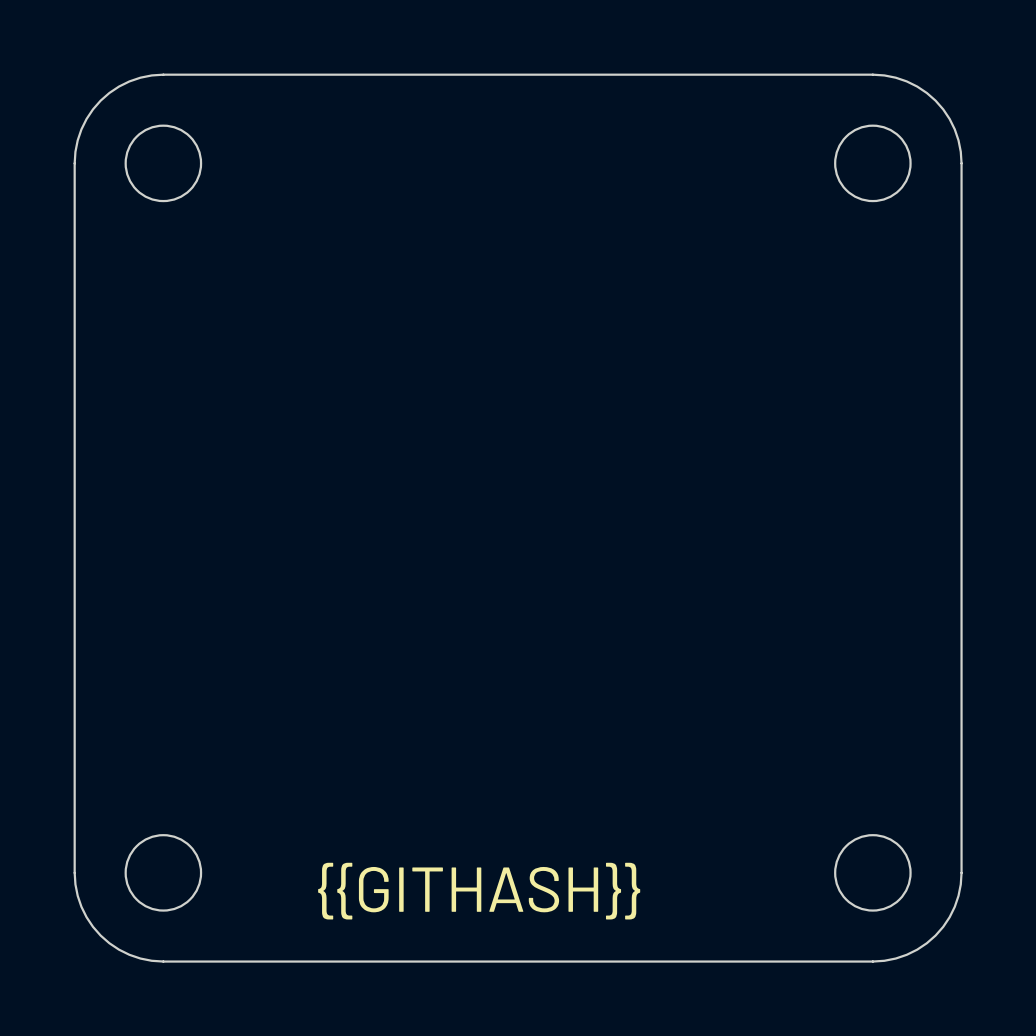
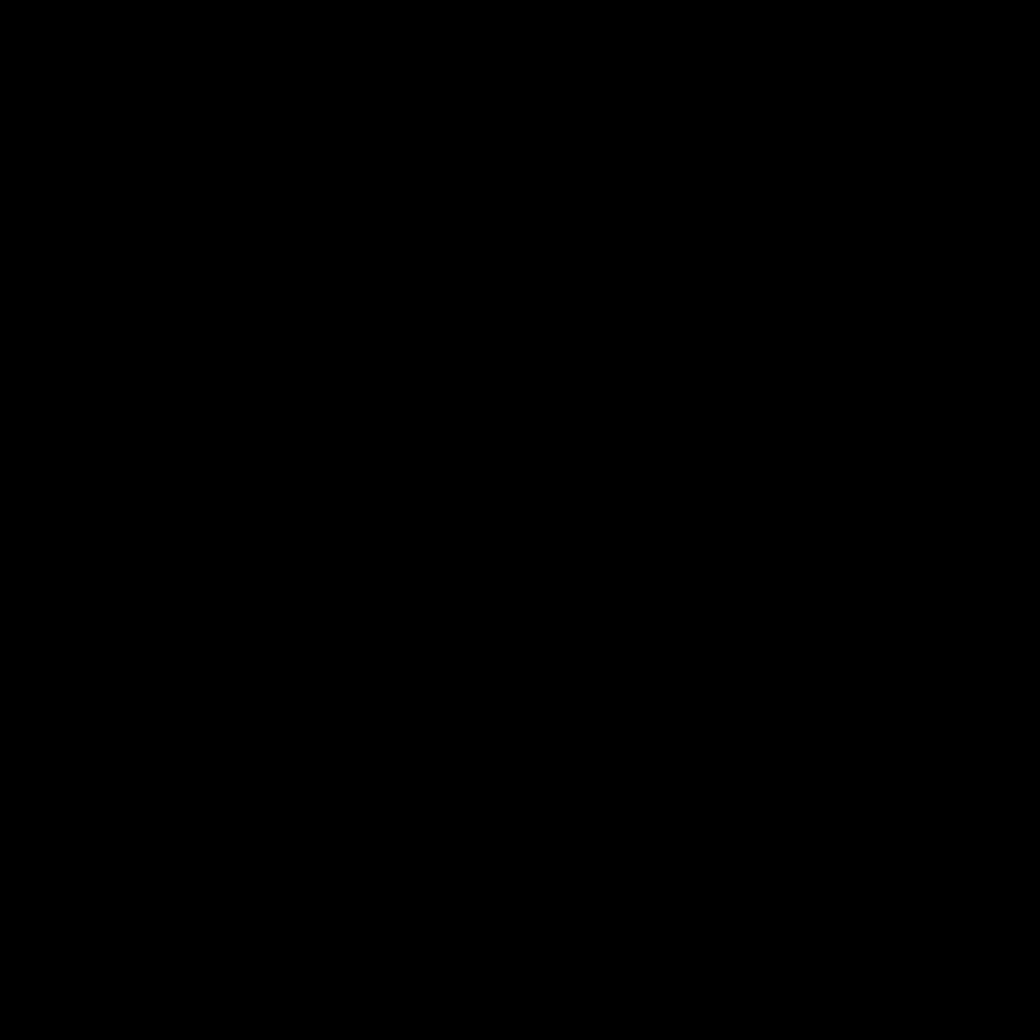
board edge: (163, 74) (872, 74) (895, 77) (906, 81) (926, 93) (935, 100) (943, 109) (954, 129) (958, 140) (961, 163) (961, 872) (960, 884) (954, 906) (943, 926) (935, 935) (926, 943) (906, 954) (895, 958) (872, 961) (163, 961) (151, 960) (129, 954) (109, 943) (100, 935) (86, 917) (81, 906) (75, 884) (74, 872) (75, 151) (81, 129) (86, 119) (100, 100) (109, 93) (129, 81) (140, 77) (163, 74) -> none
round board edge: [124, 124, 203, 203] -> none
round board edge: [834, 124, 912, 203] -> none
round board edge: [124, 834, 203, 912] -> none
round board edge: [834, 834, 912, 912] -> none
text: {{GITHASH}} (479, 891) -> none

